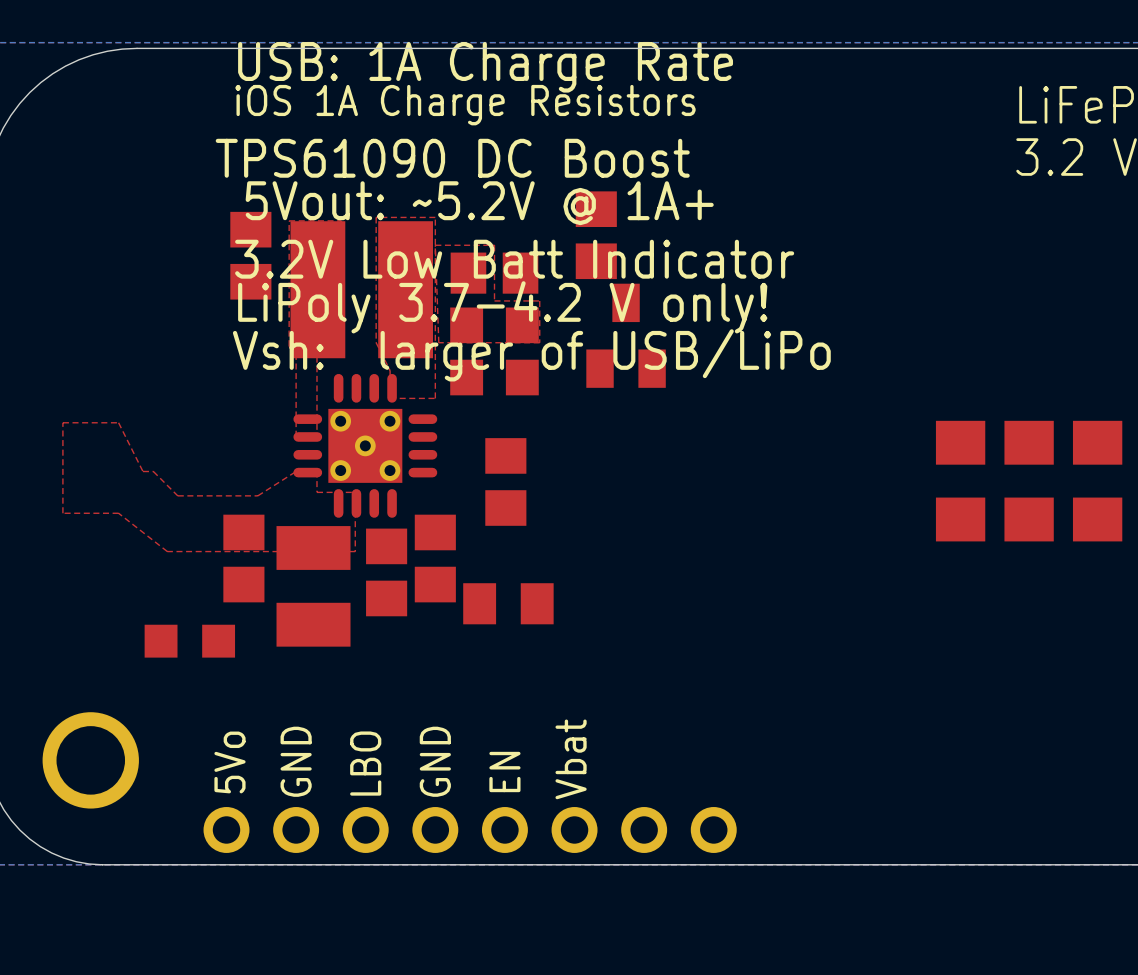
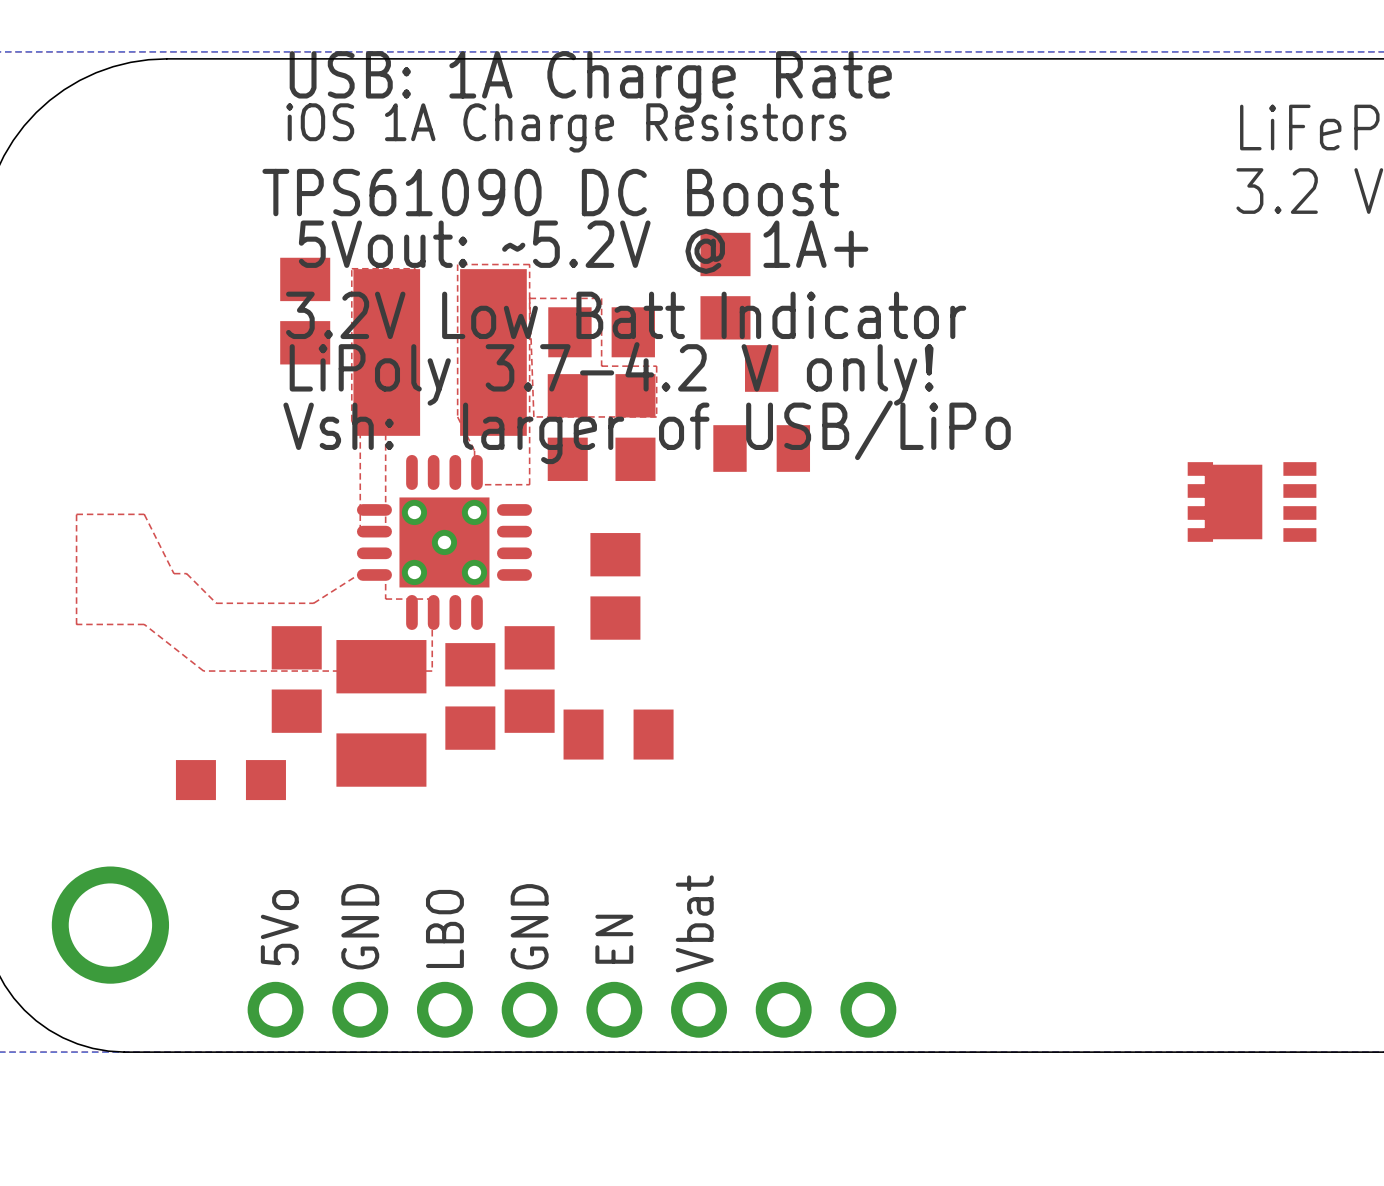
part: none -> (1252, 501)
part: (960, 481) -> none
part: (1029, 481) -> none
part: (1097, 481) -> none

